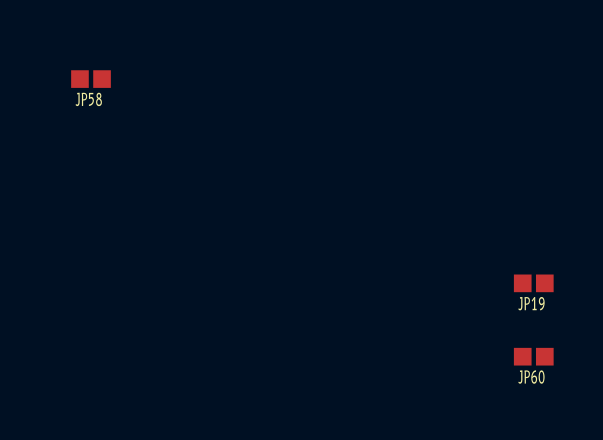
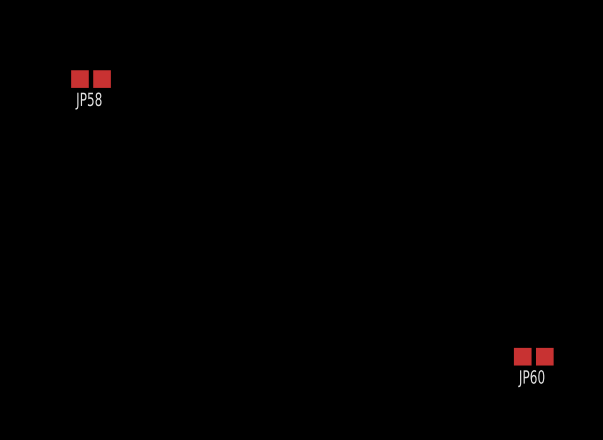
JP19: (533, 283) -> none

